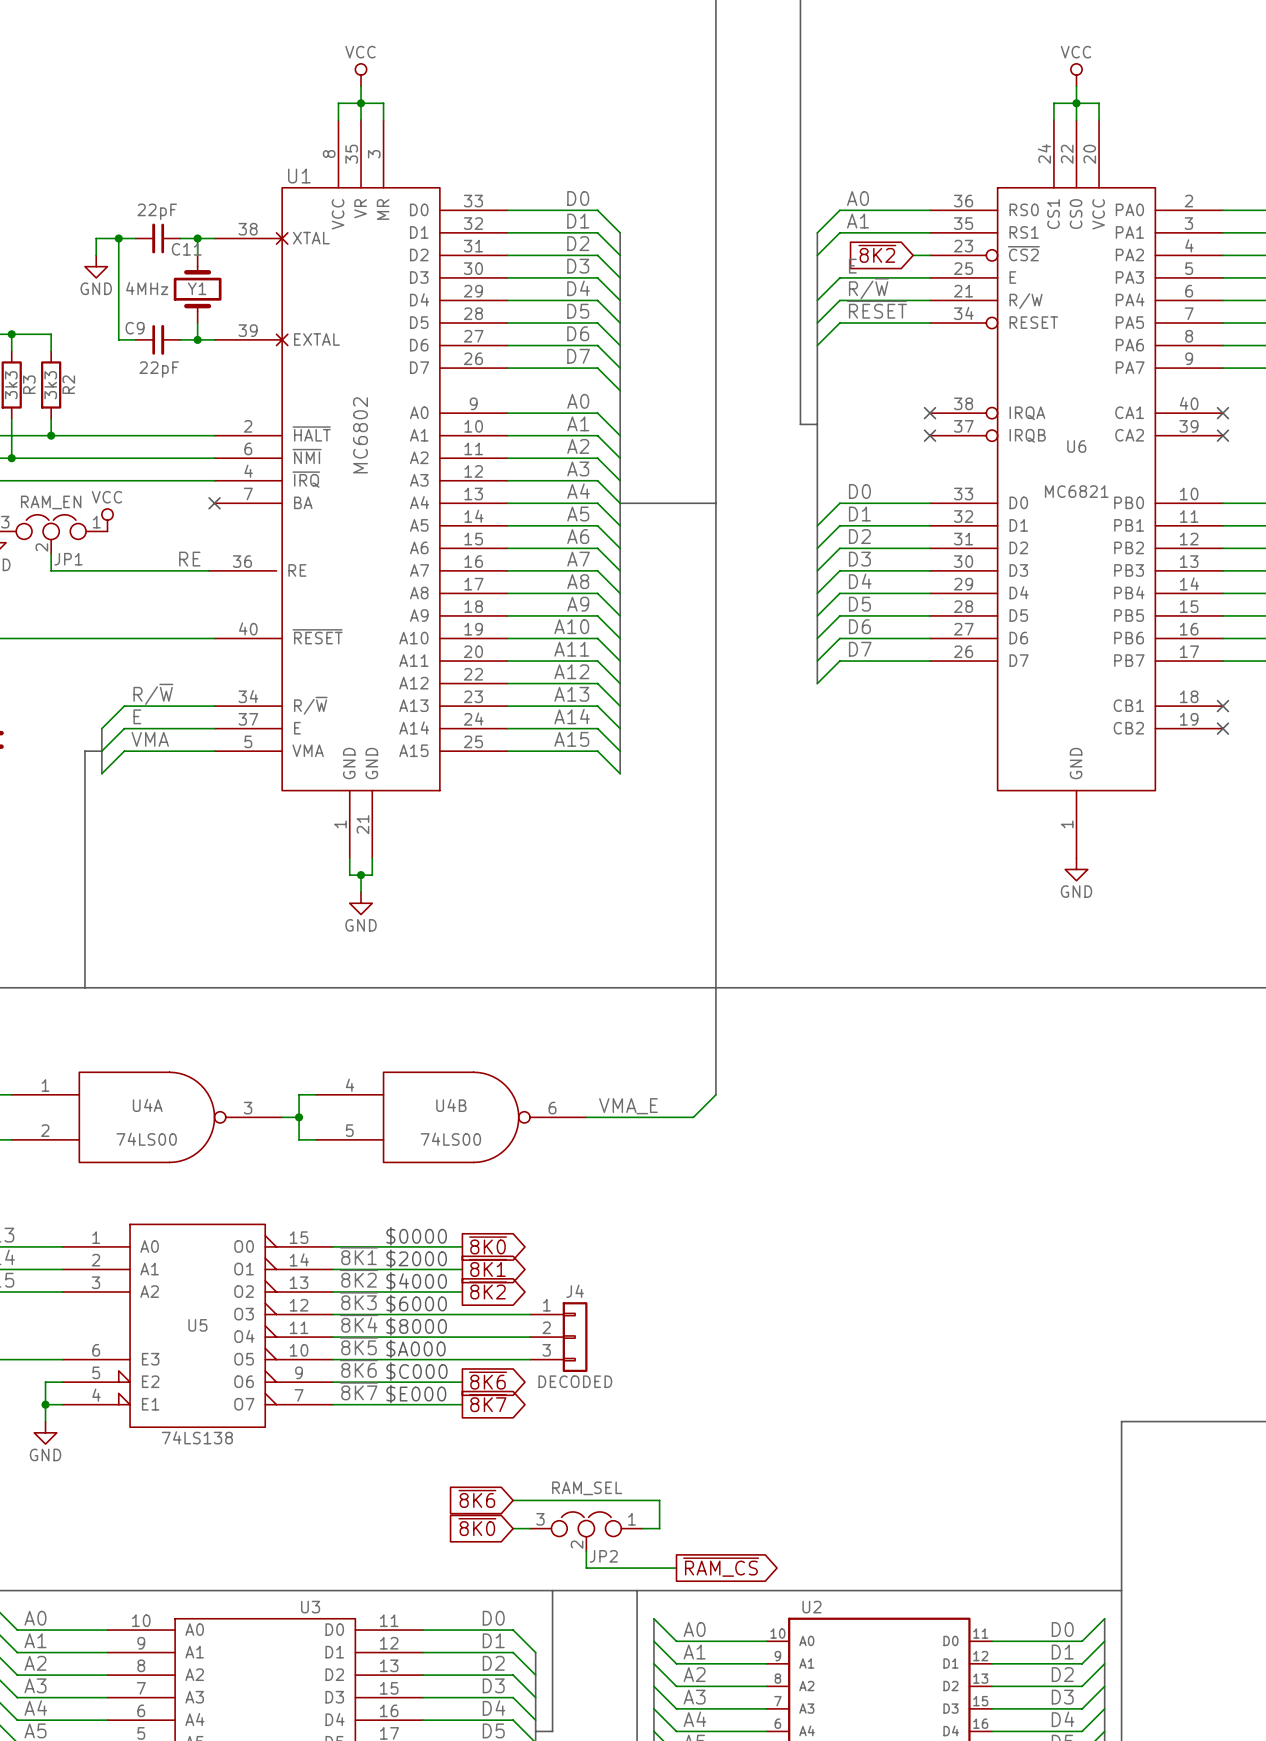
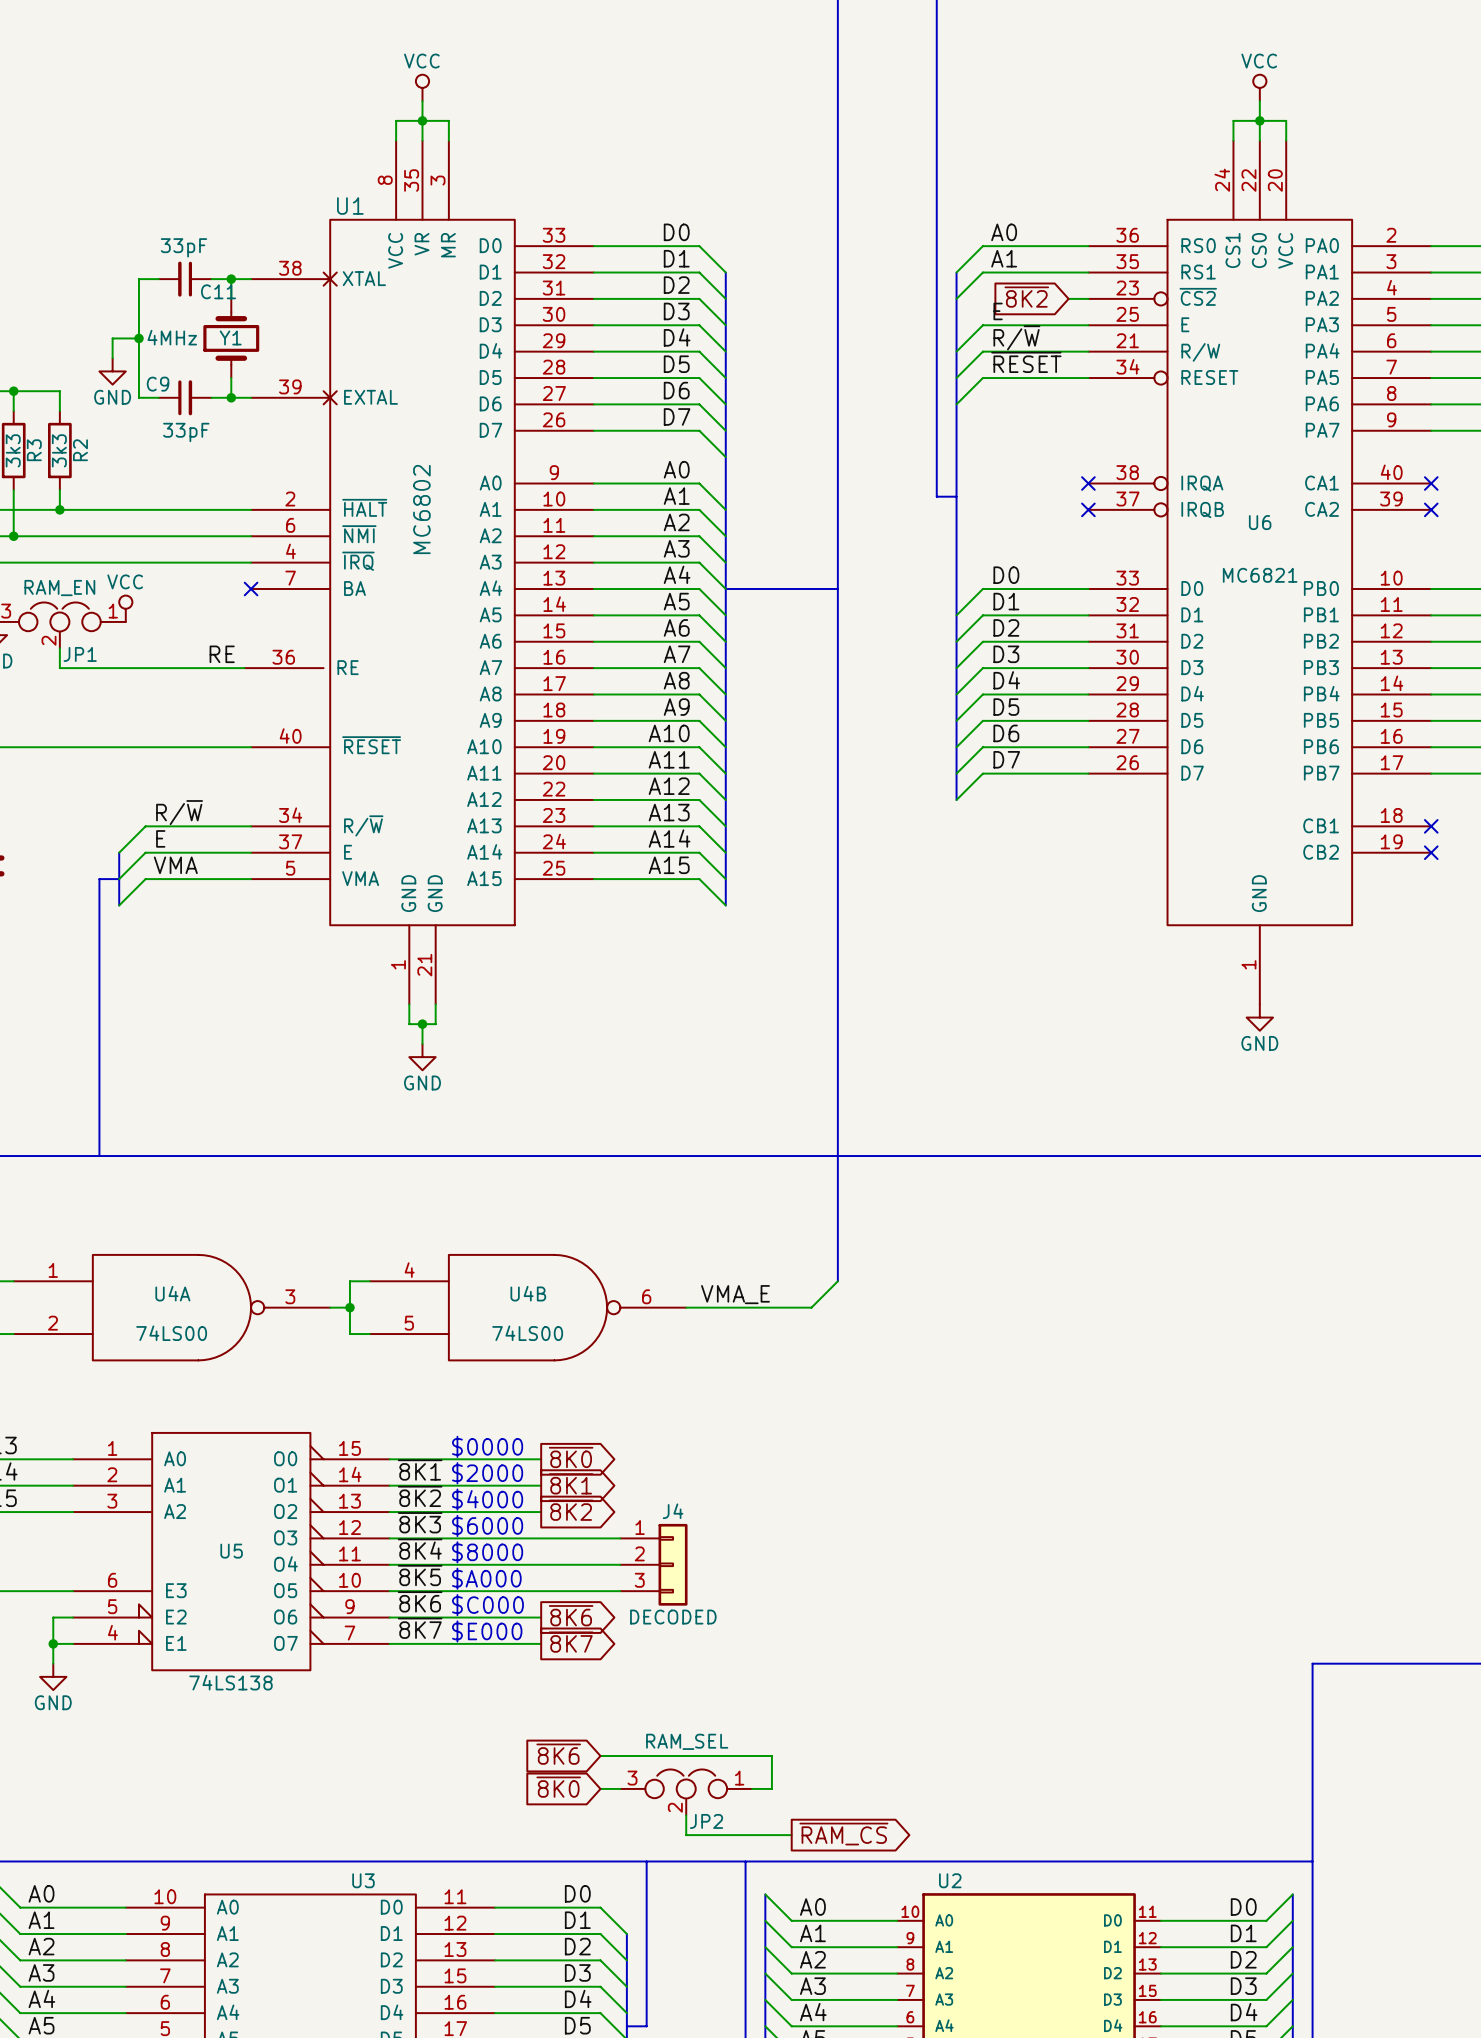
C11 value: 22pF (157, 211) -> 33pF (183, 247)
wire: (118, 238) (96, 238) (96, 255) -> (138, 338) (112, 338) (112, 358)
junction position: (118, 238) -> (138, 338)
power symbol position: GND (96, 266) -> GND (112, 371)
C9 value: 22pF (159, 369) -> 33pF (186, 432)

